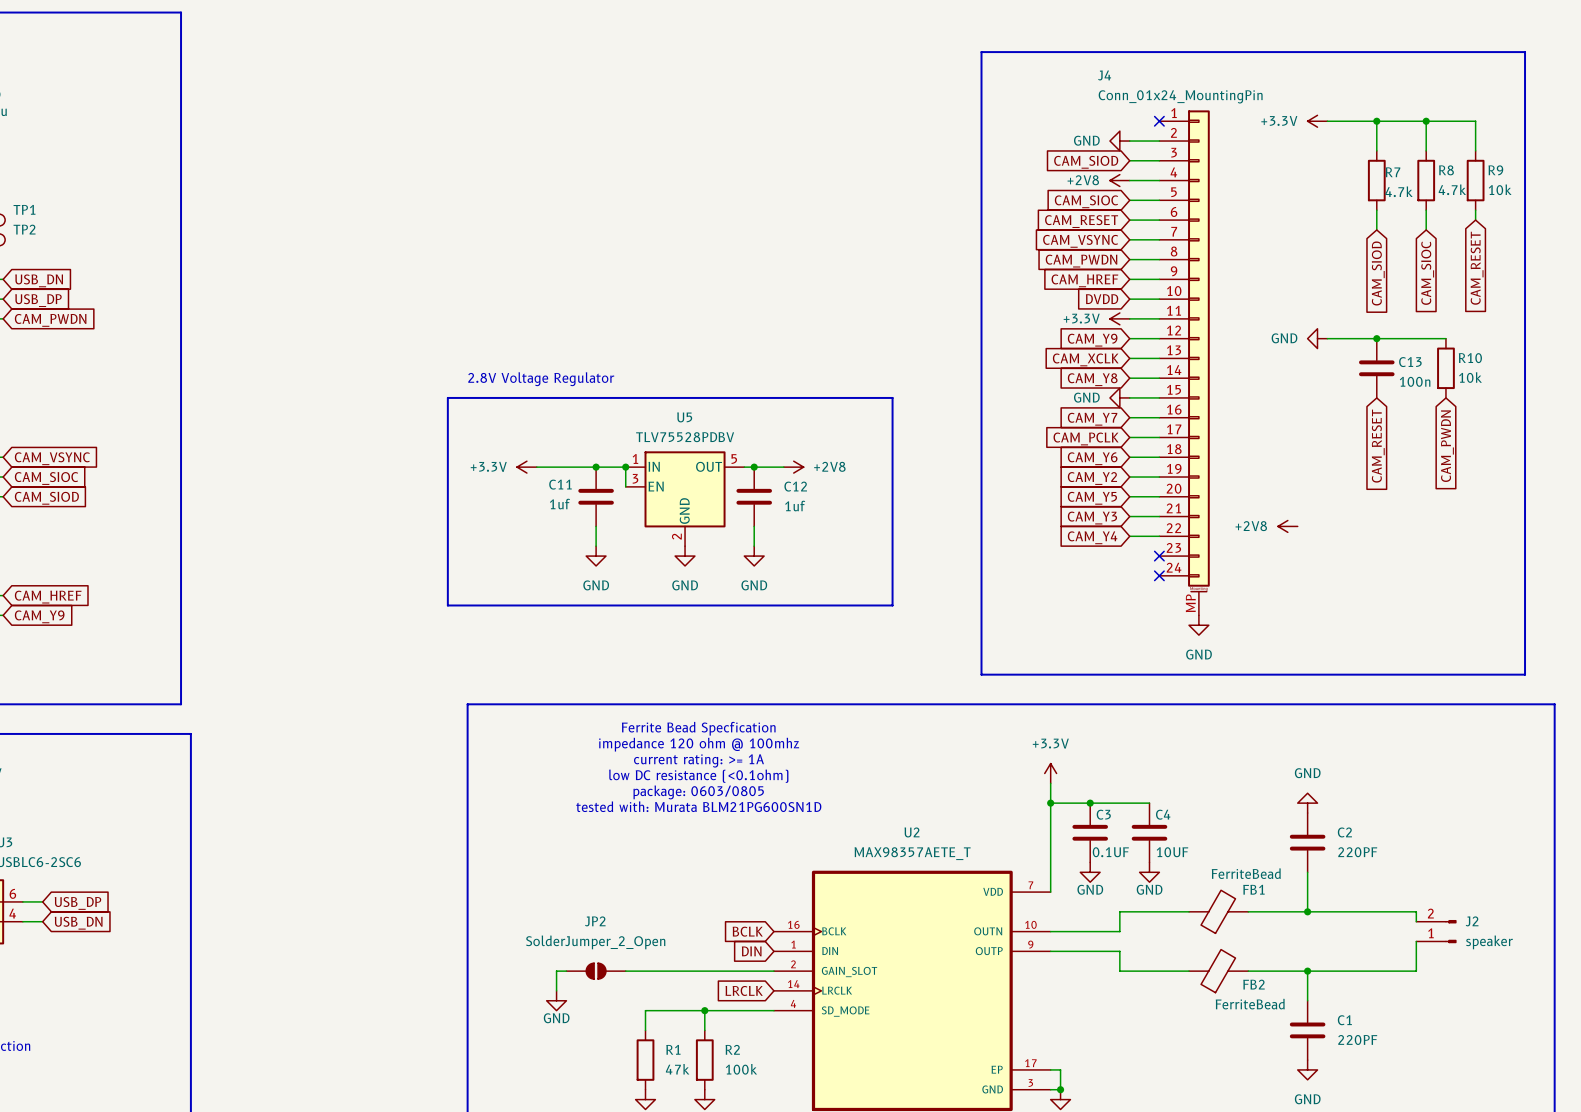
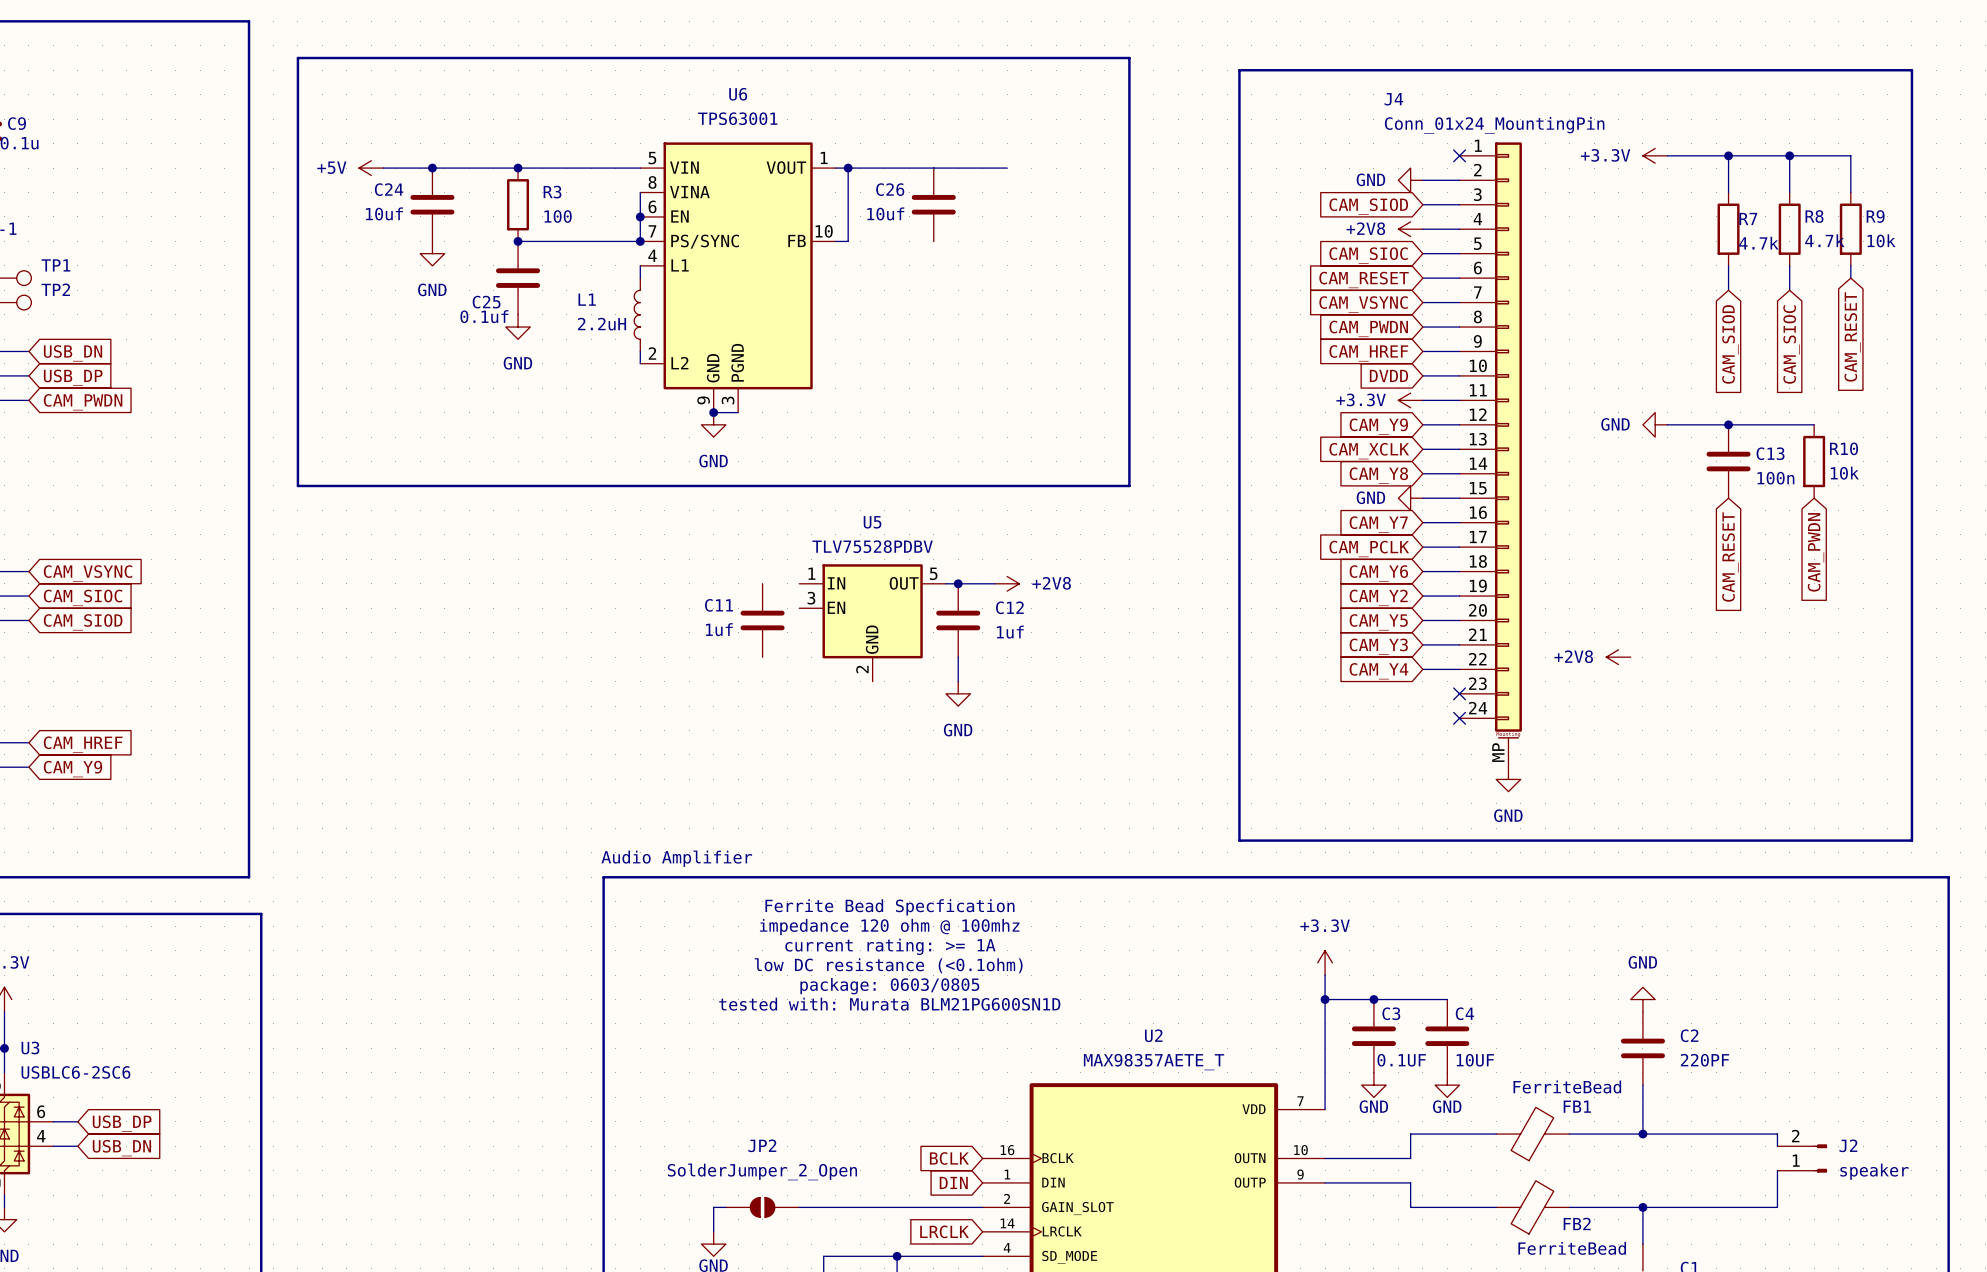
line: none -> (297, 58) (1129, 58) (1129, 485) (297, 485) (297, 58)
power symbol: none -> +5V (371, 168)
wire: none -> (383, 168) (640, 168)
junction: none -> (432, 168)
junction: none -> (518, 168)
wire: none -> (835, 168) (1007, 168)
wire: none -> (848, 168) (848, 241) (835, 241)
junction: none -> (848, 168)
wire: none -> (640, 192) (640, 241) (518, 241)
C24: none -> 10uf (432, 204)
R3: none -> 100 (518, 204)
C26: none -> 10uf (933, 204)
junction: none -> (640, 216)
junction: none -> (518, 241)
junction: none -> (640, 241)
power symbol: none -> GND (432, 253)
wire: none -> (640, 265) (640, 278)
U6: none -> TPS63001 (738, 277)
C25: none -> 0.1uf (518, 278)
L1: none -> 2.2uH (637, 314)
power symbol: none -> GND (518, 327)
wire: none -> (640, 351) (640, 363)
wire: none -> (713, 412) (738, 412)
junction: none -> (713, 412)
power symbol: none -> GND (713, 424)
text: 2.8V Voltage Regulator (541, 379) -> none
line: (447, 397) (892, 397) (892, 605) (447, 605) (447, 397) -> none
power symbol: +3.3V (526, 467) -> none
wire: (536, 467) (625, 467) (625, 486) -> none
junction: (596, 467) -> none
junction: (625, 467) -> none
wire: (596, 526) (596, 546) -> none
power symbol: GND (596, 556) -> none
power symbol: GND (685, 556) -> none
text: none -> Audio Amplifier (676, 858)

